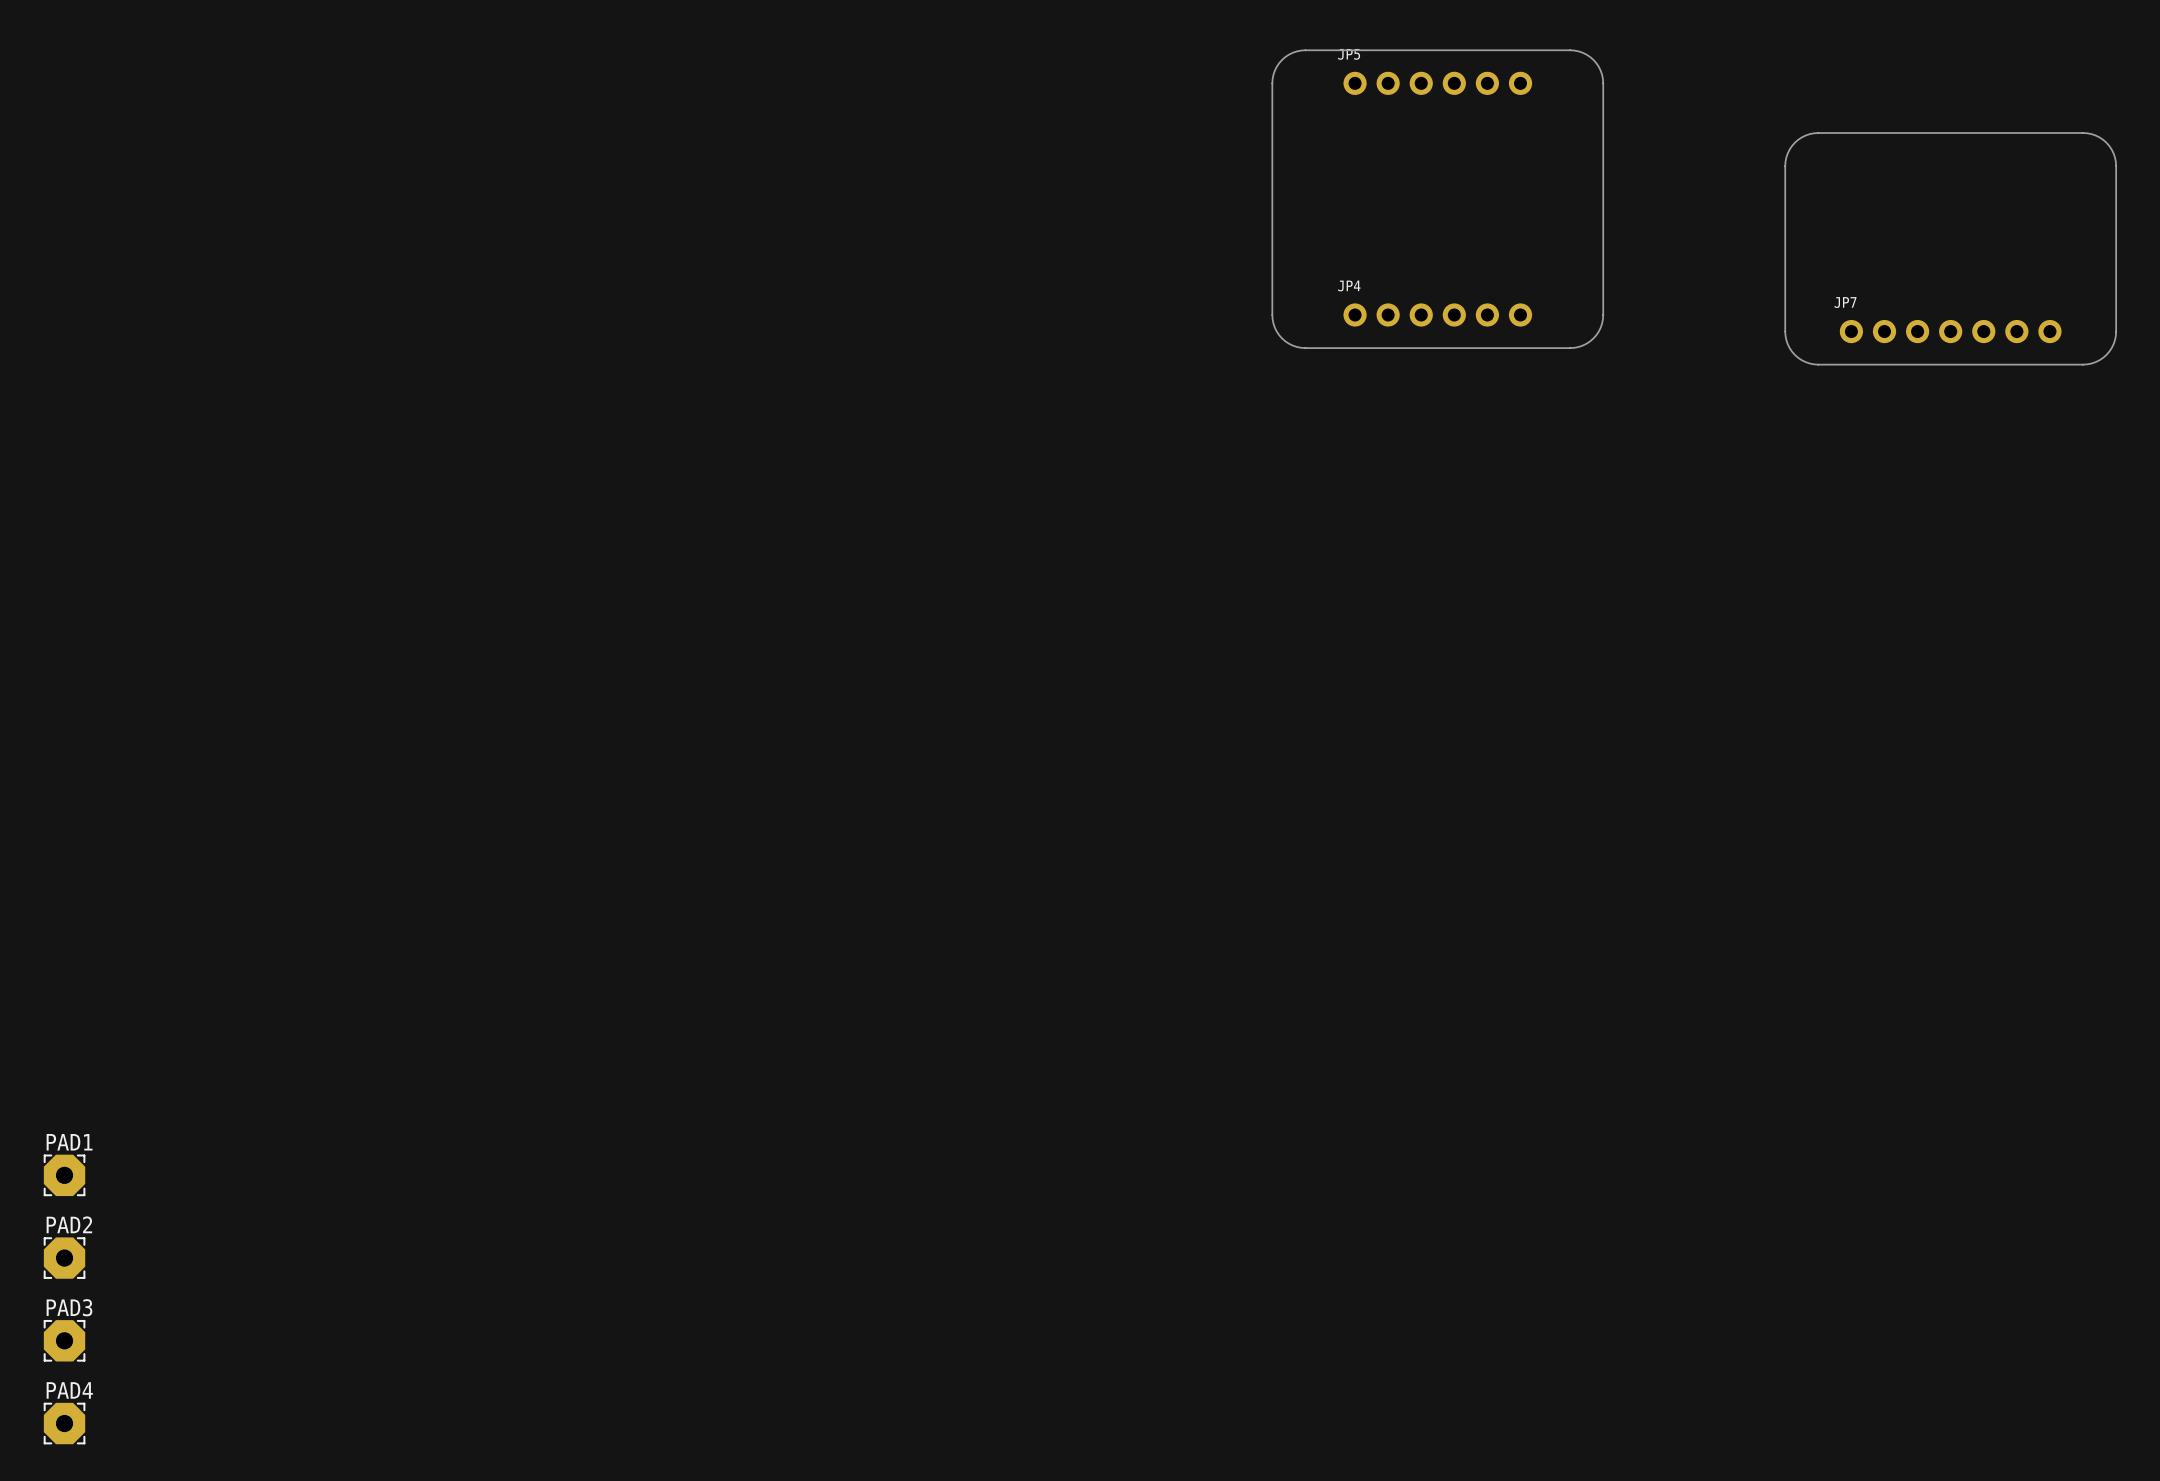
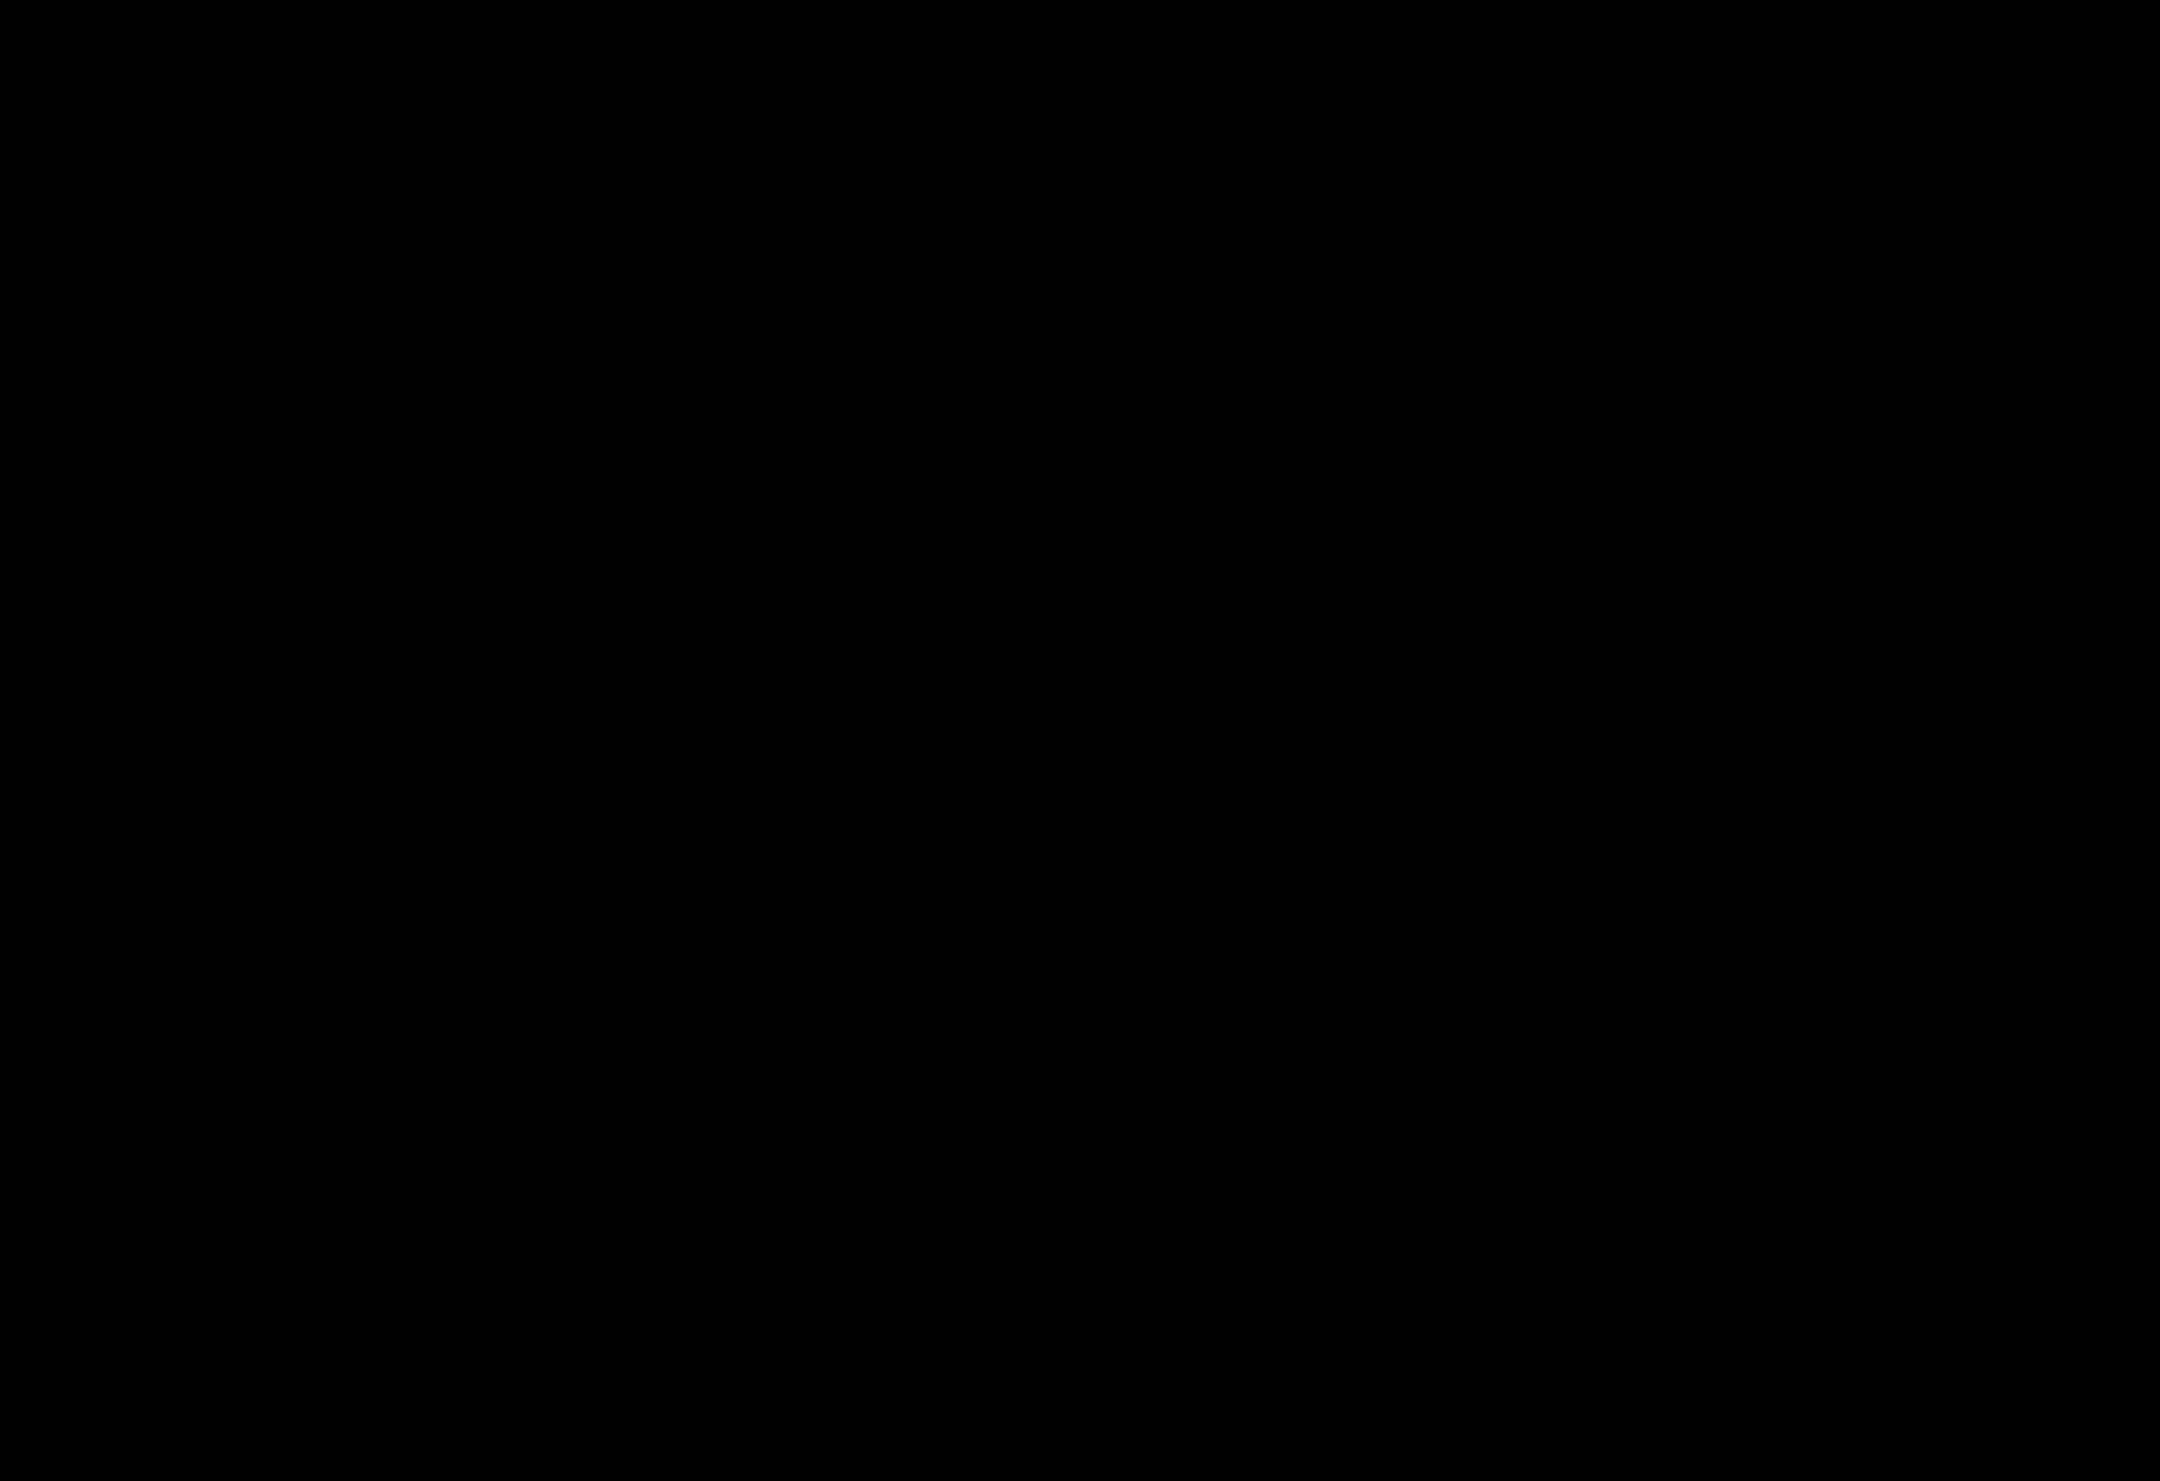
board edge: (1305, 50) (1570, 50) (1582, 52) (1593, 59) (1600, 70) (1603, 83) (1603, 315) (1600, 327) (1593, 338) (1582, 345) (1570, 348) (1305, 348) (1292, 345) (1282, 338) (1274, 327) (1272, 315) (1272, 79) (1274, 70) (1282, 59) (1292, 52) (1305, 50) -> none
JP5: (1437, 83) -> none
board edge: (1818, 133) (2083, 133) (2091, 134) (2103, 139) (2113, 153) (2116, 166) (2116, 331) (2115, 340) (2109, 351) (2095, 362) (2083, 364) (1818, 364) (1809, 363) (1798, 357) (1787, 344) (1785, 331) (1785, 161) (1787, 153) (1794, 142) (1805, 135) (1818, 133) -> none
JP4: (1437, 315) -> none
JP7: (1950, 331) -> none
PAD1: (64, 1175) -> none
PAD2: (64, 1258) -> none
PAD3: (64, 1340) -> none
PAD4: (64, 1423) -> none

